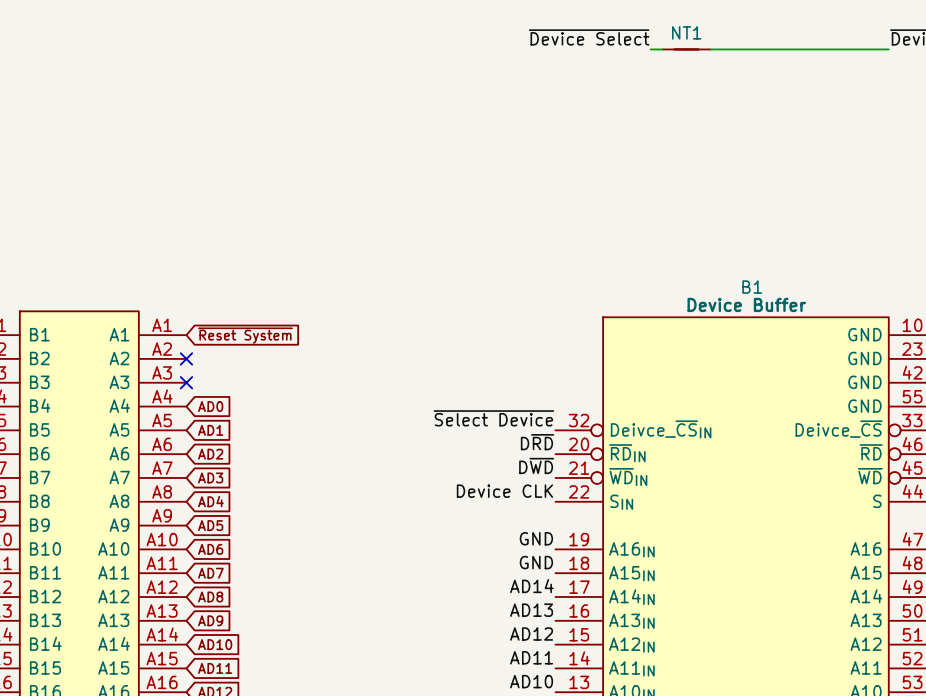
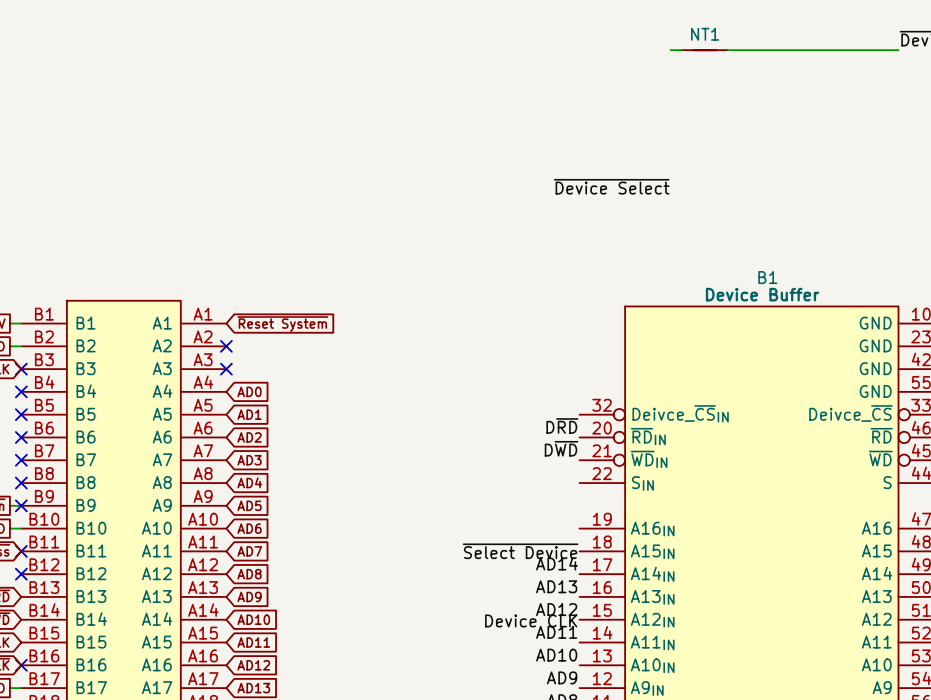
label position: ~{Device Select} (589, 37) -> ~{Device Select} (611, 186)
label position: ~{Select Device} (493, 418) -> ~{Select Device} (520, 551)
label position: Device CLK (504, 491) -> Device CLK (531, 620)
label: GND (536, 538) -> none
label: GND (536, 562) -> none

